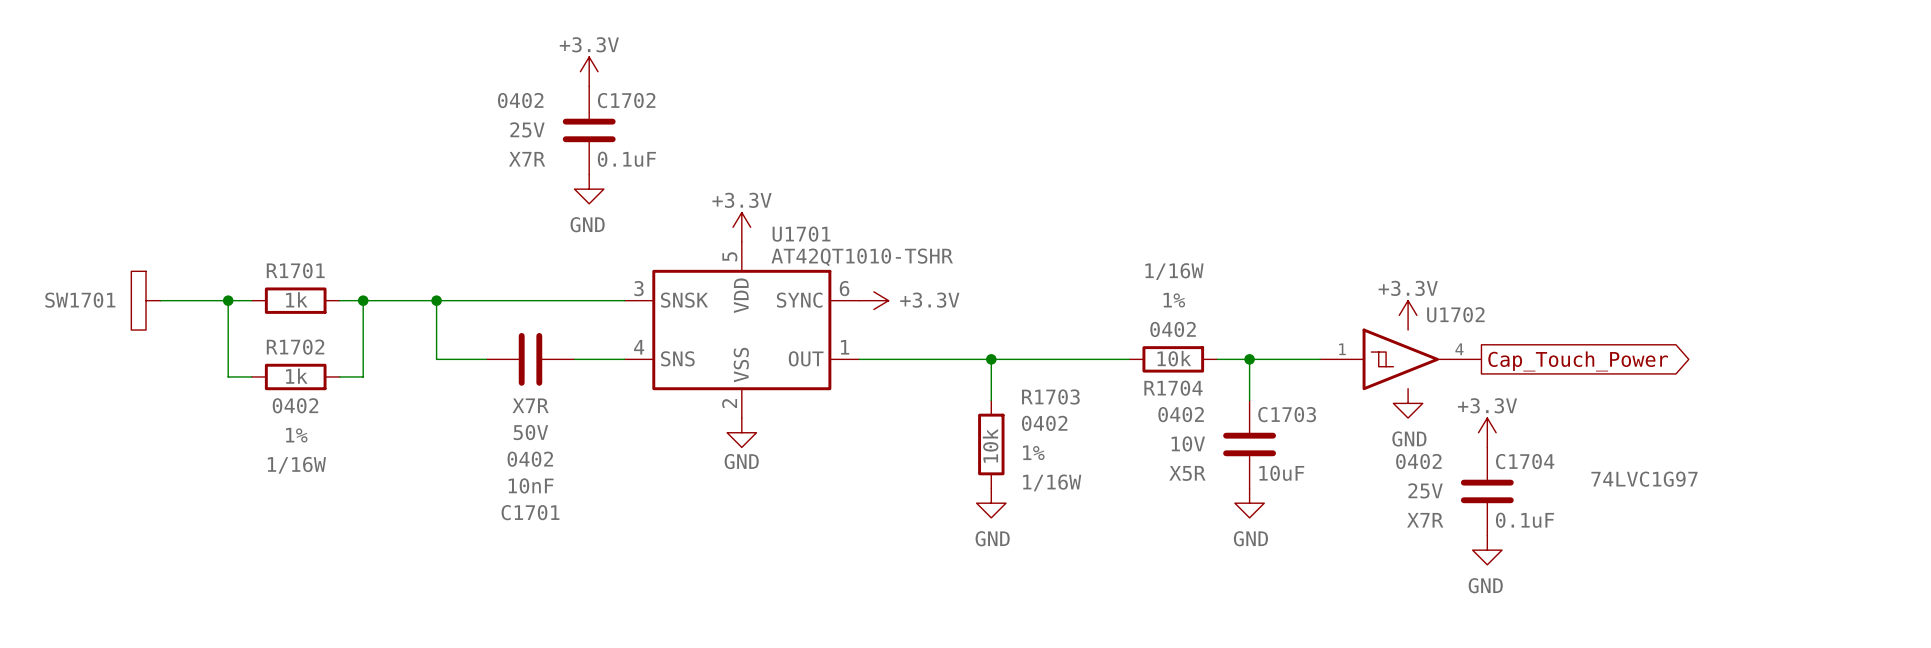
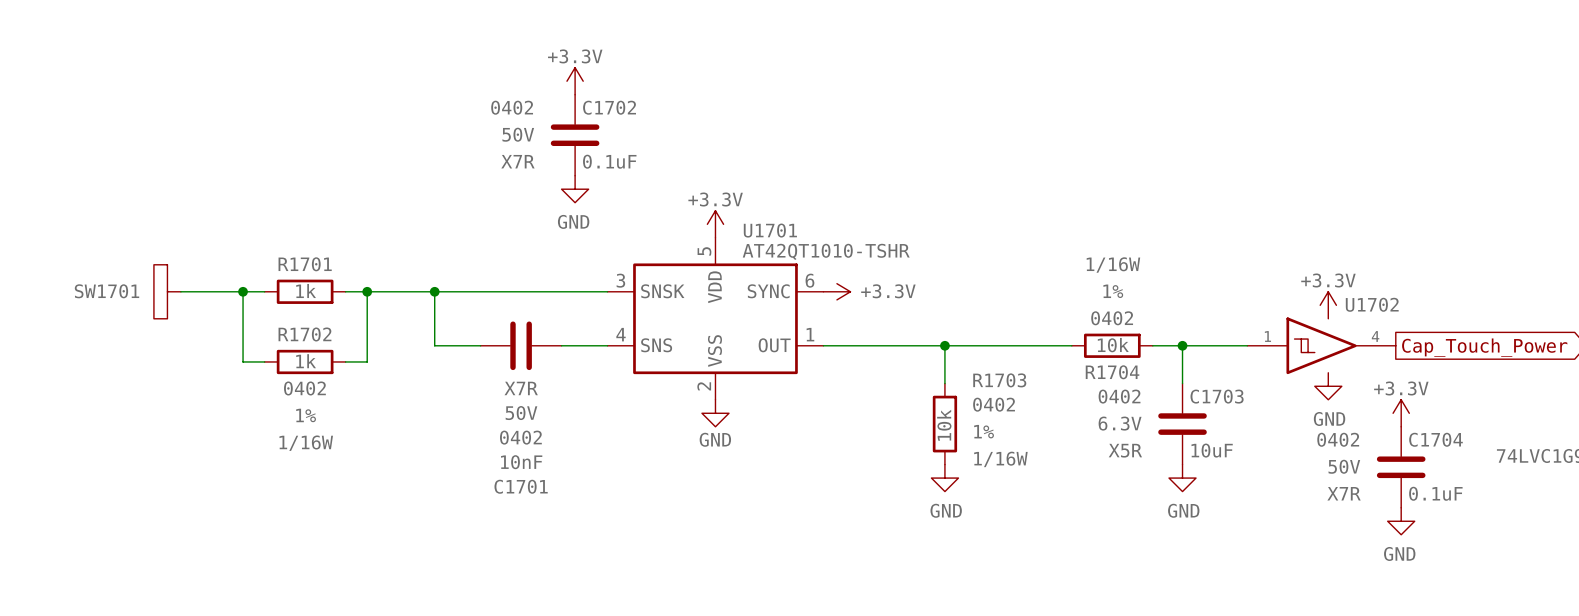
C1702 text: 25V (527, 129) -> 50V (518, 134)
C1703 text: 10V (1188, 443) -> 6.3V (1120, 423)
C1704 text: 25V (1425, 490) -> 50V (1344, 466)

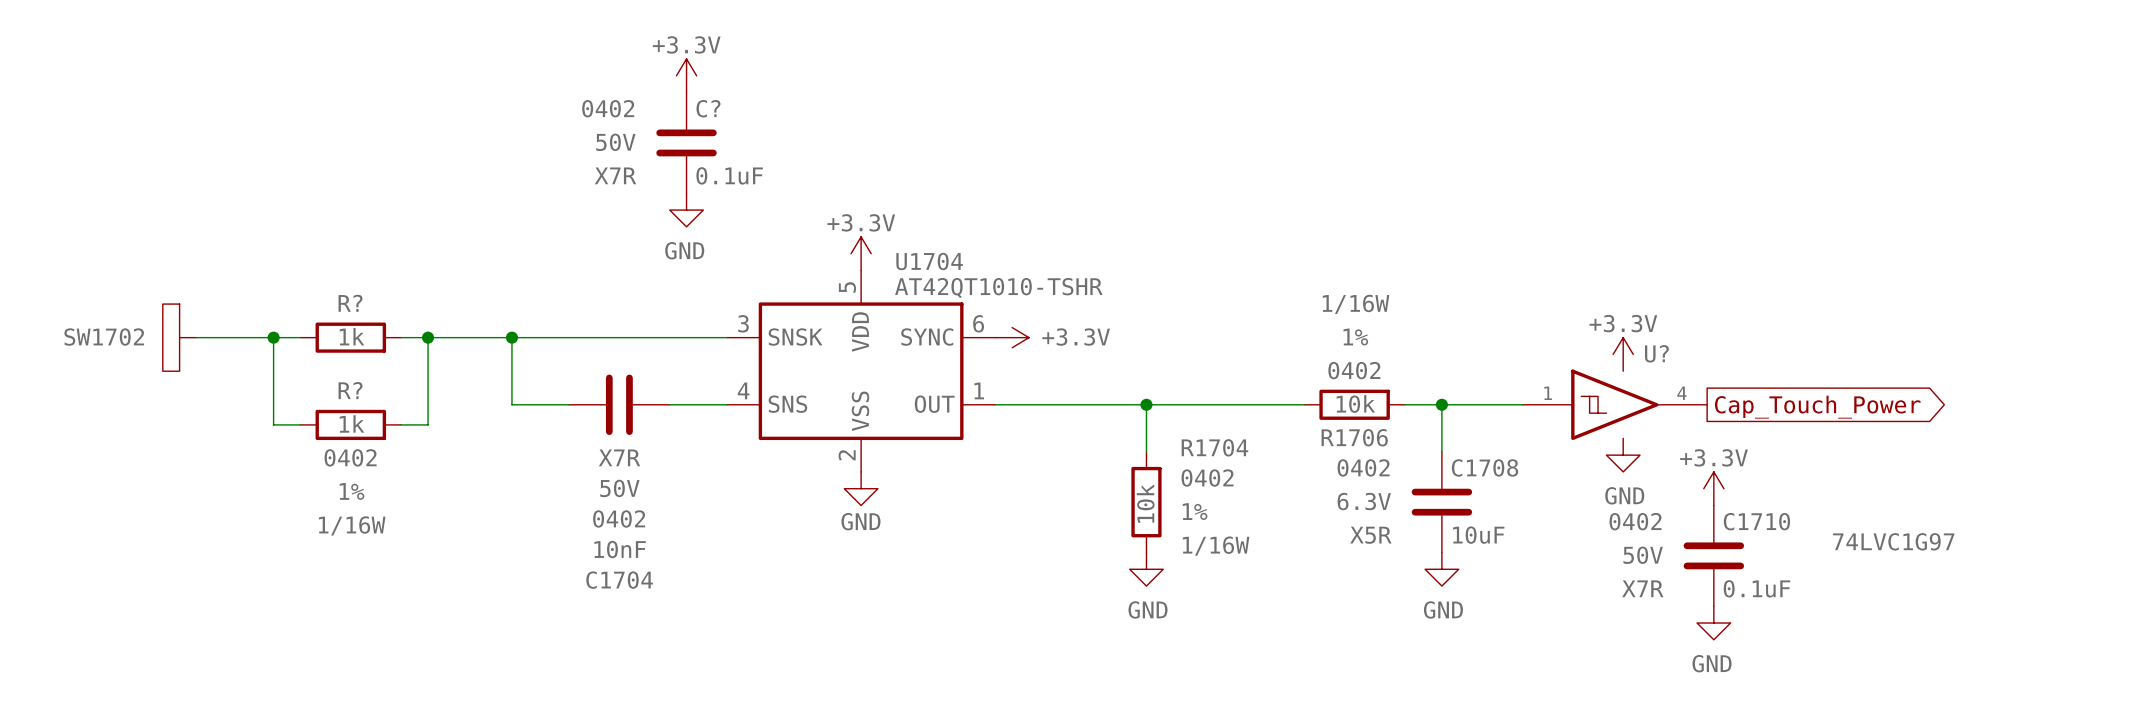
C1702 name: C1702 (609, 107) -> C? (708, 108)
U1701 name: U1701 (770, 230) -> U1704 (929, 261)
R1701 name: R1701 (305, 264) -> R? (350, 303)
SW1701 name: SW1701 (107, 291) -> SW1702 (104, 337)
U1702 name: U1702 (1372, 304) -> U? (1656, 353)
R1702 name: R1702 (304, 334) -> R? (350, 390)
R1704 name: R1704 (1112, 372) -> R1706 (1354, 437)
R1703 name: R1703 (999, 380) -> R1704 (1214, 447)
C1703 name: C1703 (1217, 396) -> C1708 (1485, 467)
C1704 name: C1704 (1435, 439) -> C1710 (1756, 521)
C1701 name: C1701 (521, 486) -> C1704 (619, 580)

